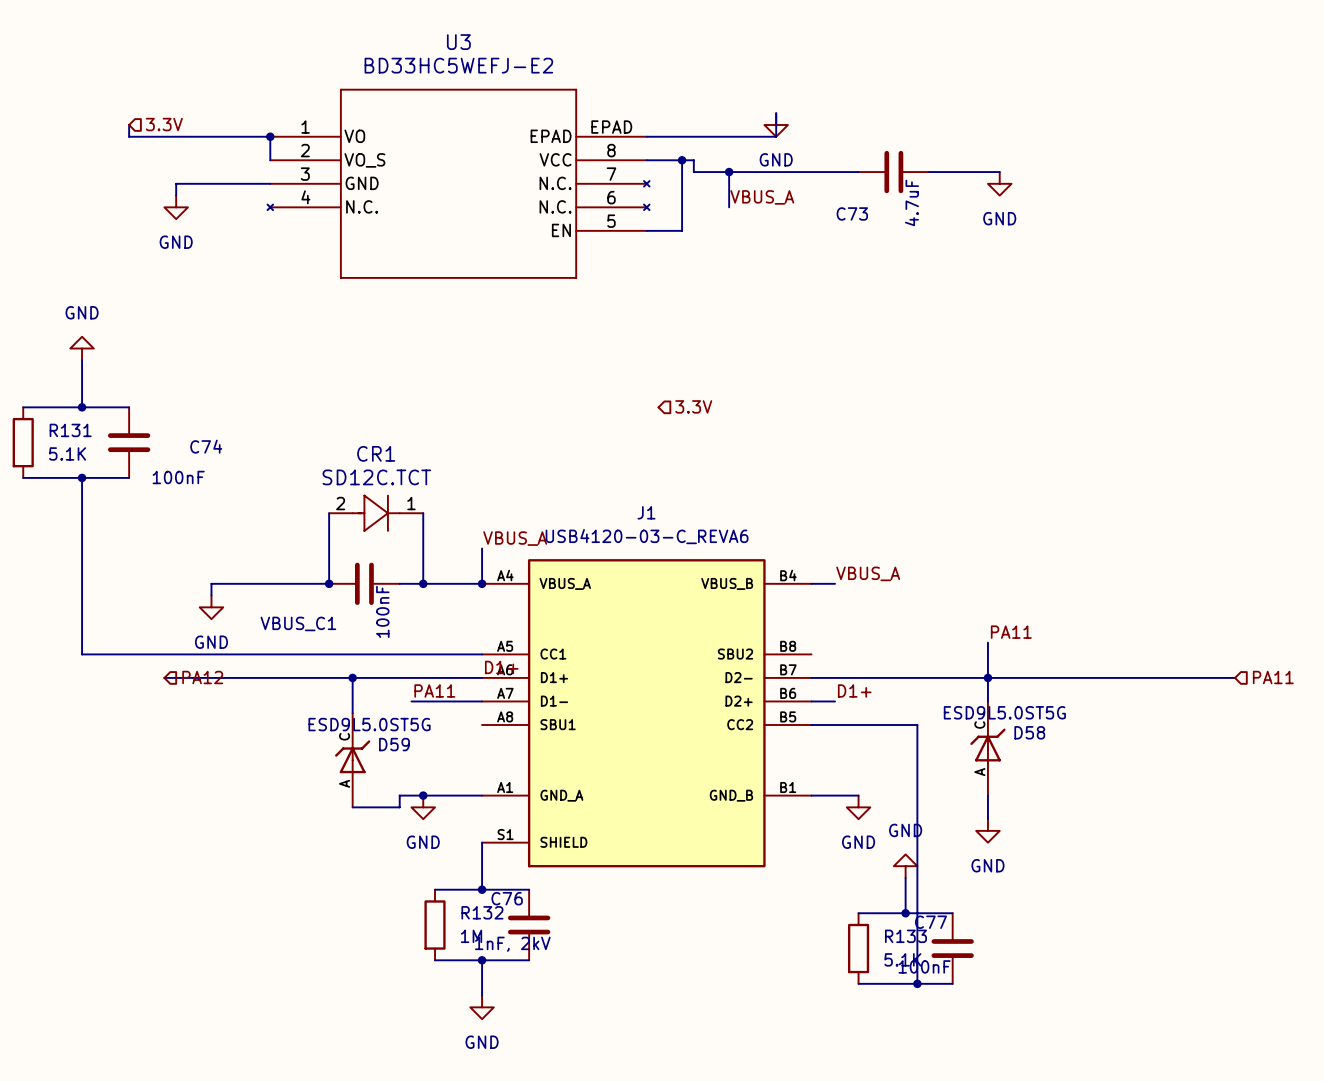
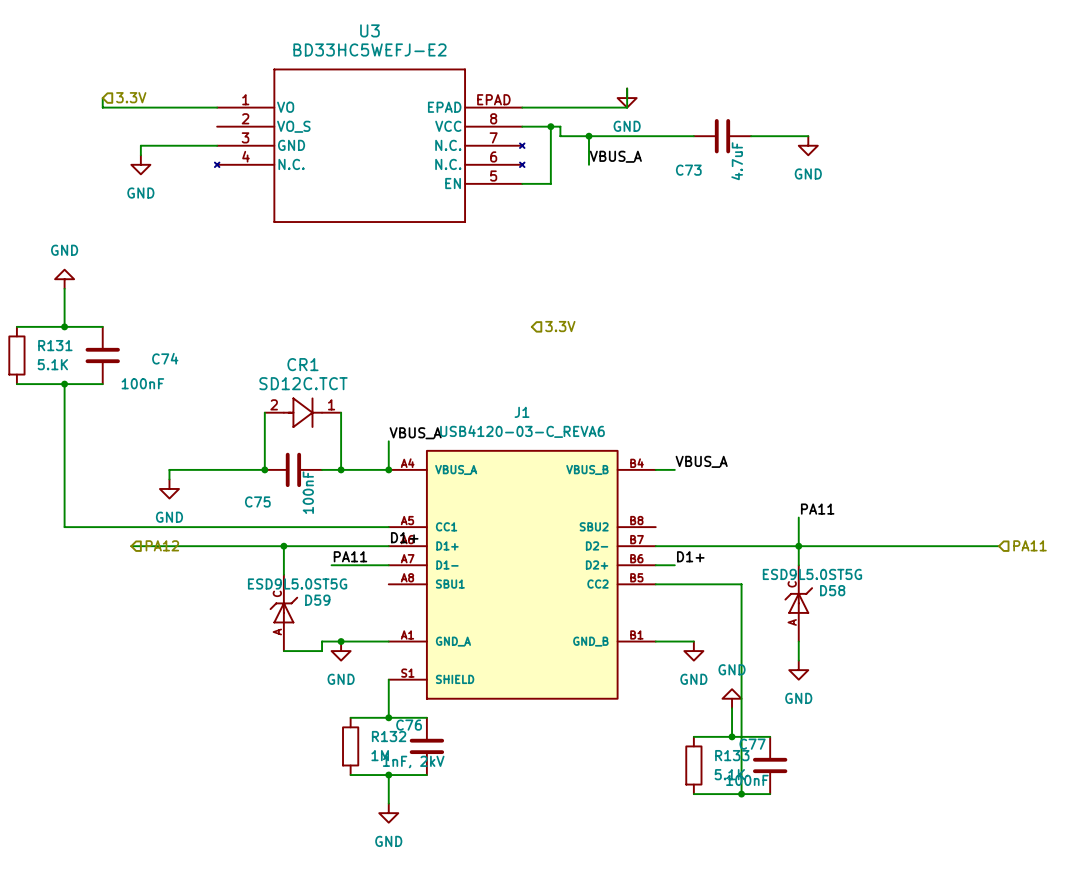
wire: (270, 136) (270, 160) -> none
junction: (270, 136) -> none
VBUS_C1 name: VBUS_C1 (298, 623) -> C75 (257, 501)

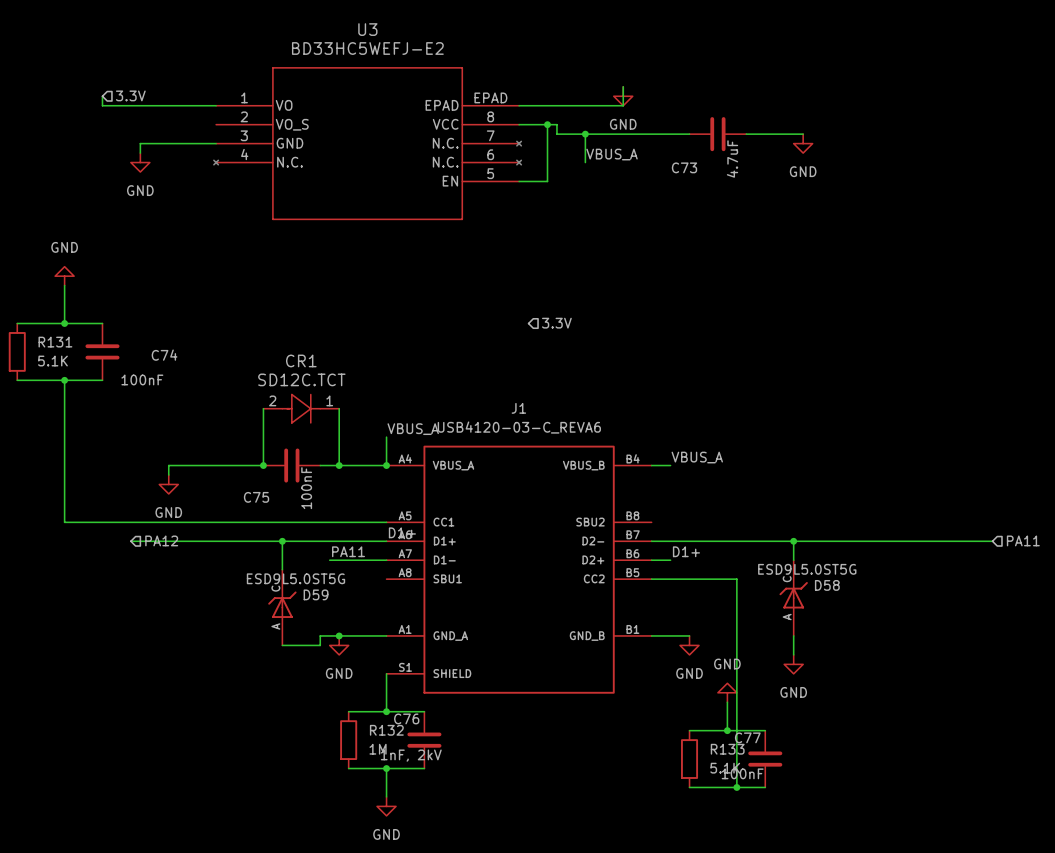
label: PA11 (817, 509) -> none
wire: (798, 517) (798, 546) -> none

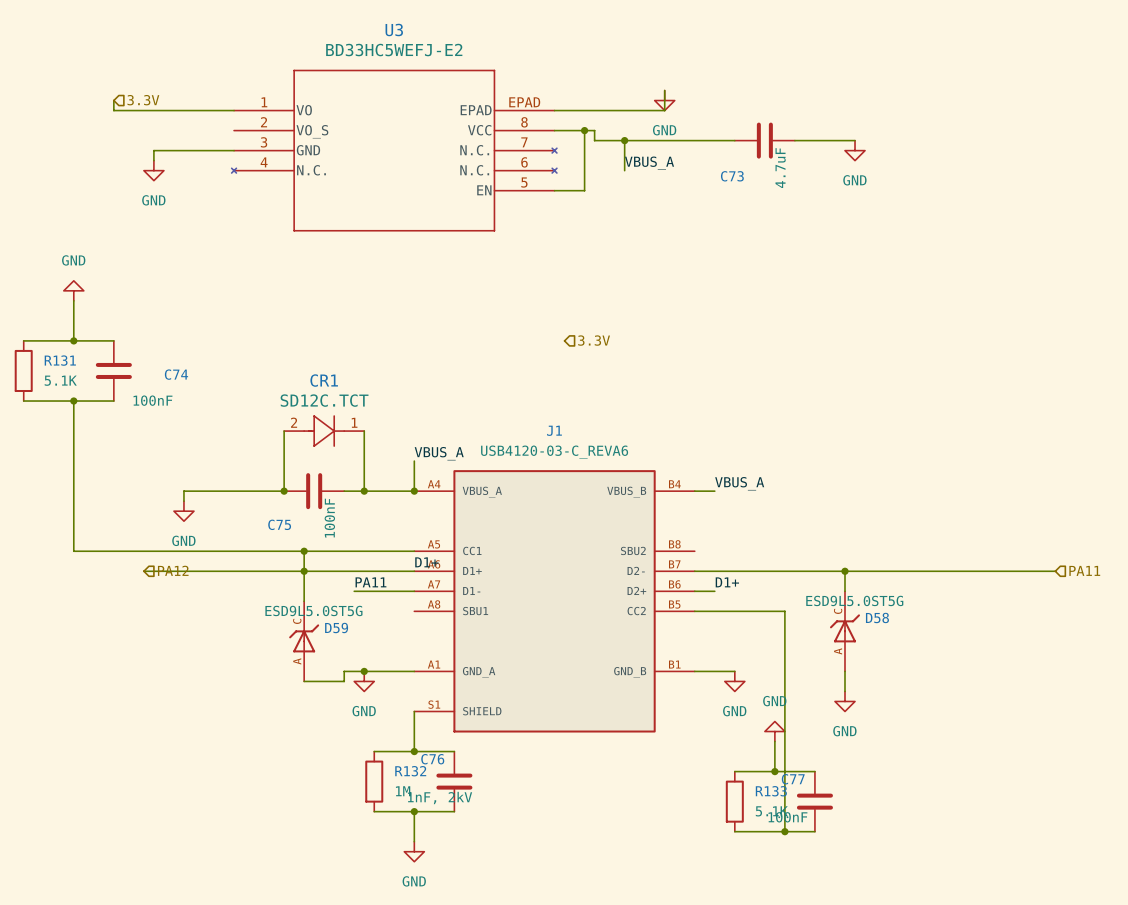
wire: none -> (304, 551) (304, 571)
junction: none -> (304, 551)

